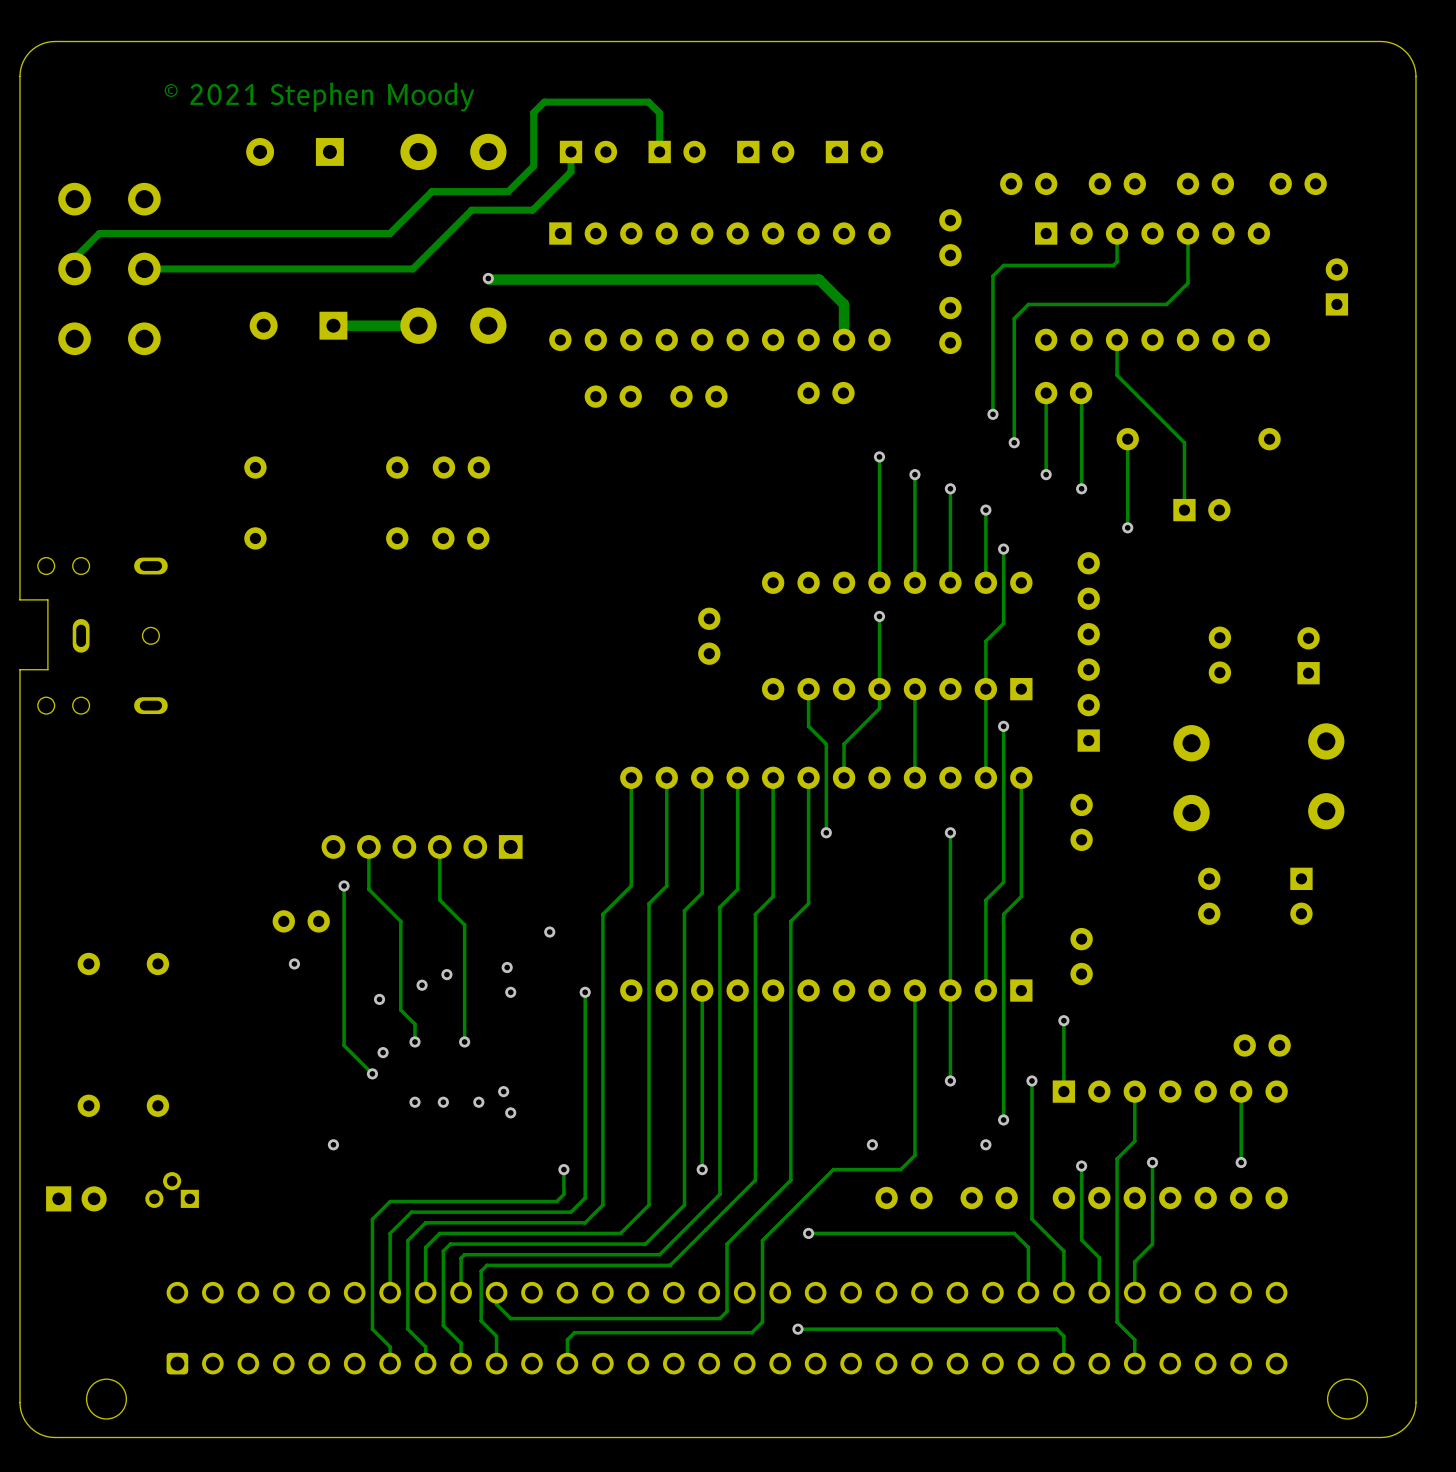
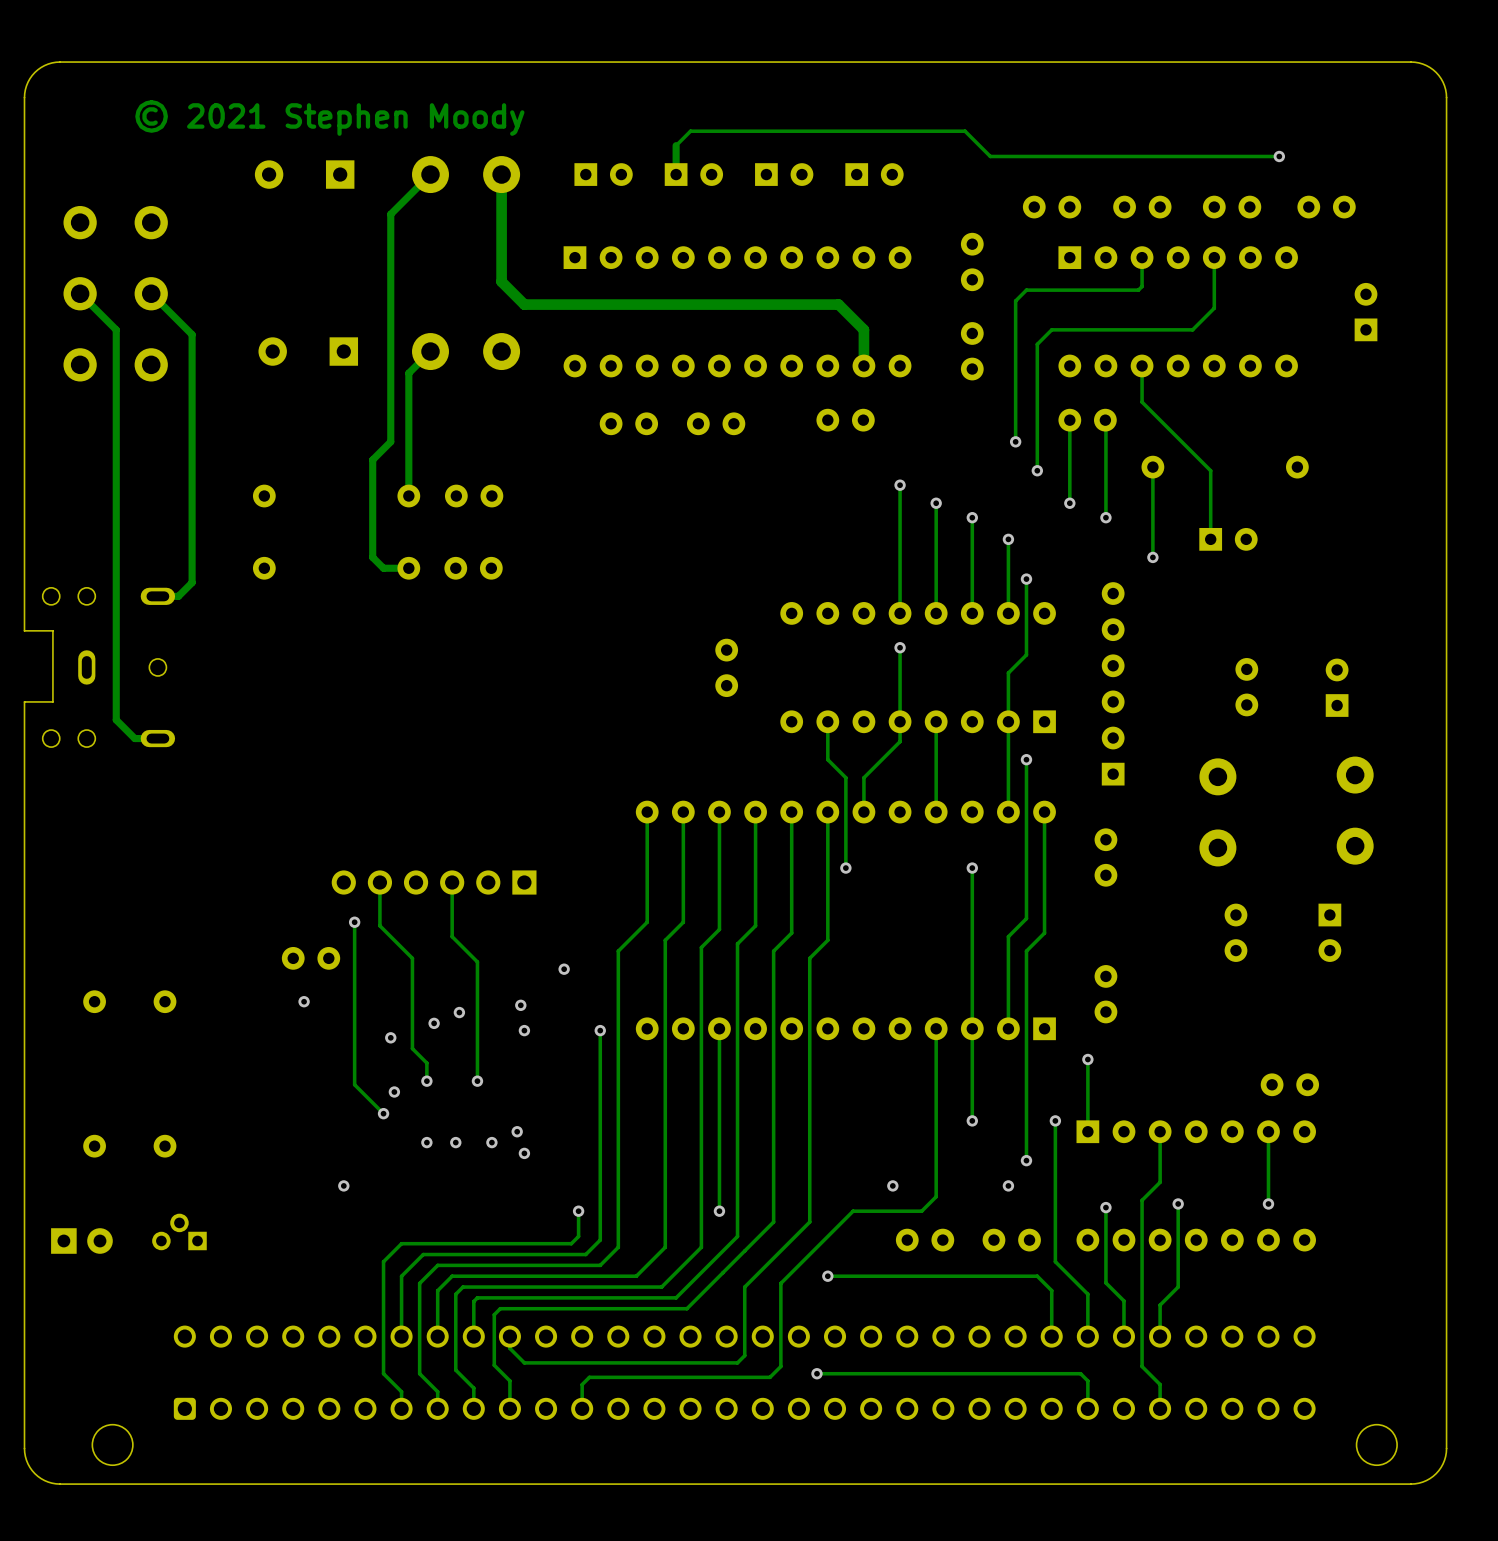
track: (659, 123) (659, 113) (648, 102) (544, 102) (533, 112) (533, 166) (508, 191) (431, 191) (390, 233) (99, 233) (74, 258) (74, 268) -> (157, 738) (134, 738) (116, 719) (116, 329) (80, 293)
track: none -> (676, 145) (690, 131) (965, 131) (990, 156) (1279, 156)
via: none -> (1279, 156)
track: none -> (430, 174) (390, 214) (390, 441) (372, 459) (372, 557) (383, 568) (408, 568)
track: (571, 151) (571, 171) (532, 210) (471, 210) (412, 268) (144, 268) -> (157, 596) (178, 596) (192, 582) (192, 334) (151, 293)
track: (488, 278) (510, 279) -> (501, 174) (501, 281) (524, 304)
via: (488, 278) -> none
track: (418, 325) (333, 325) -> (430, 351) (408, 373) (408, 496)

